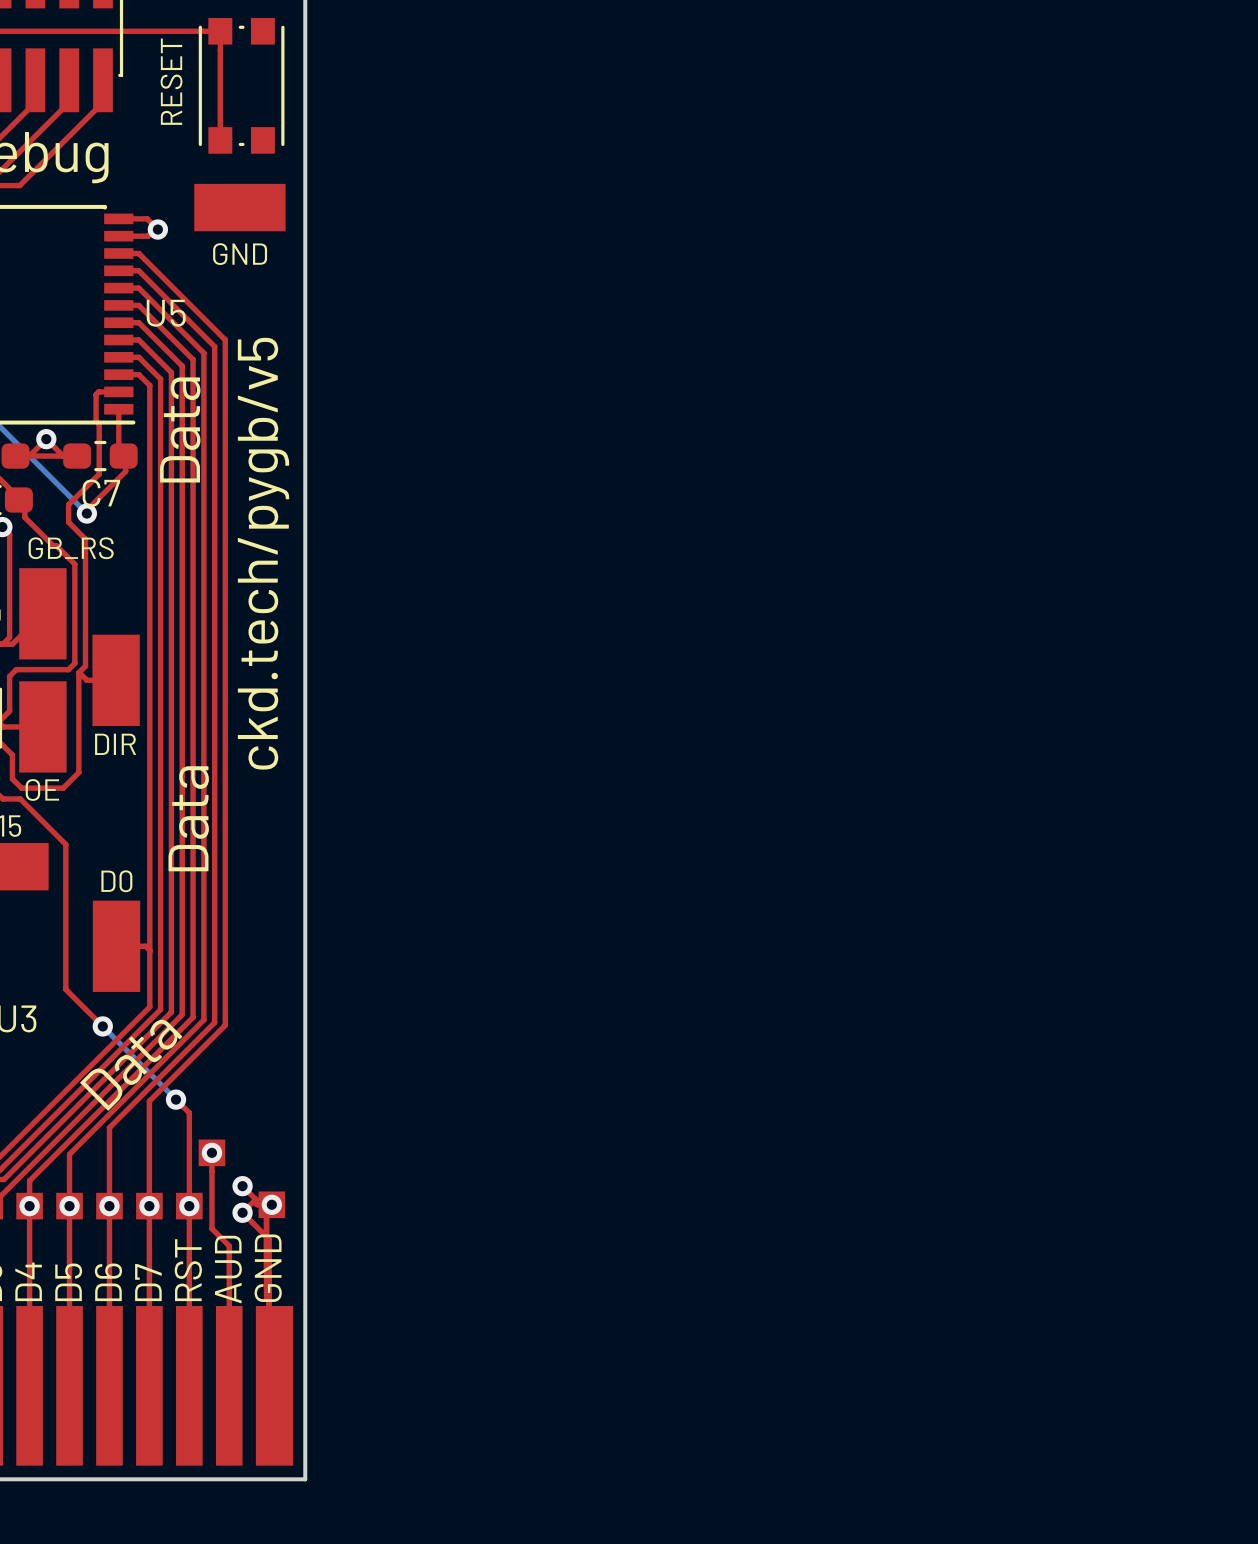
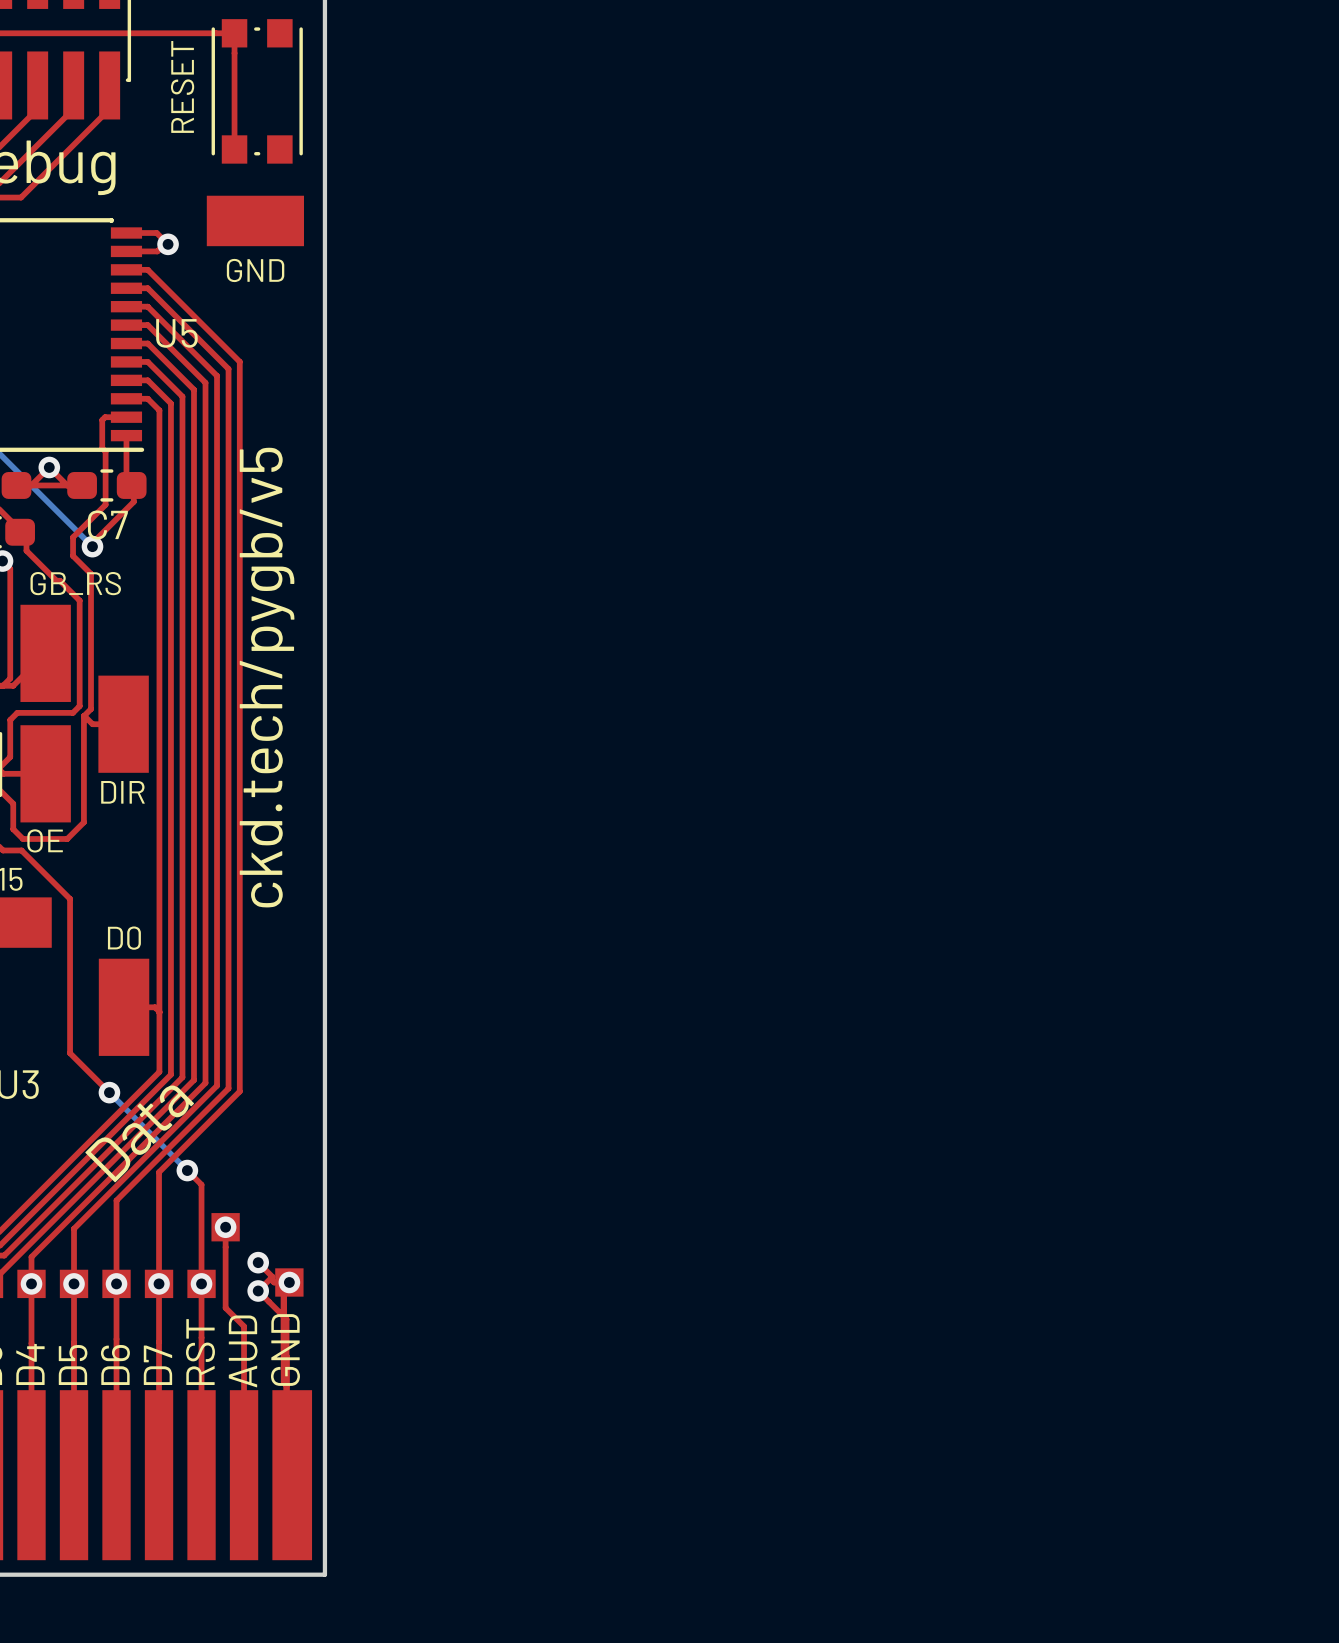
text: Data (180, 429) -> none
text position: ckd.tech/pygb/v5 (263, 553) -> ckd.tech/pygb/v5 (267, 677)
text: Data (188, 818) -> none

